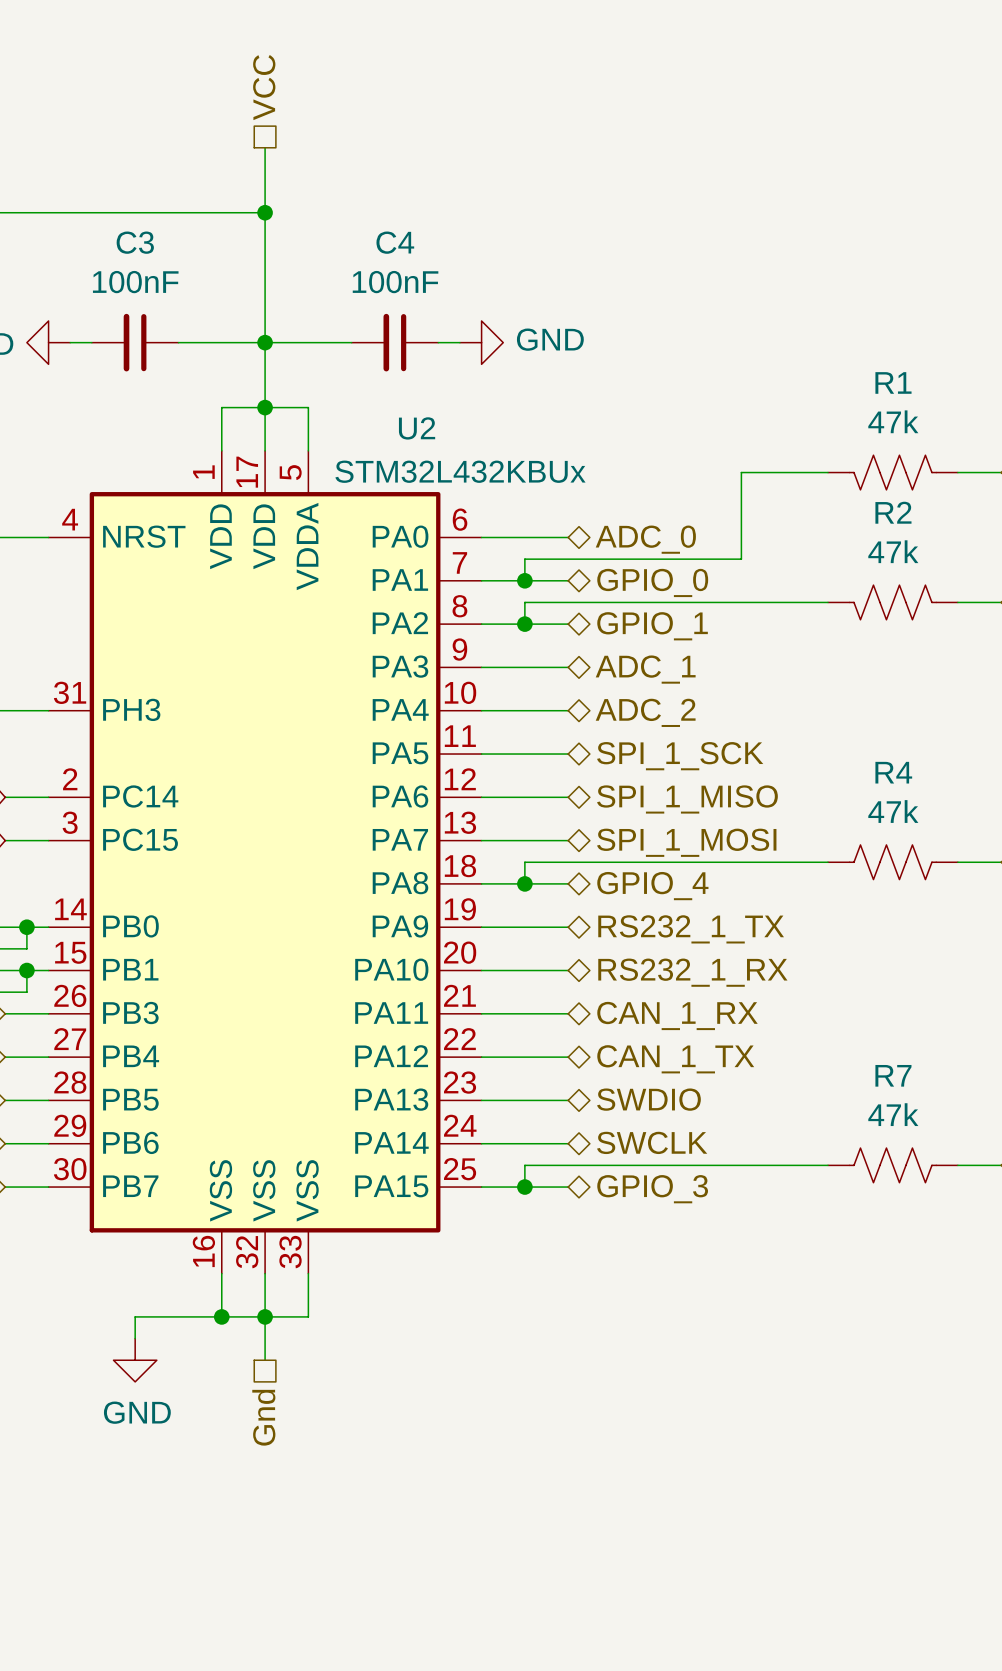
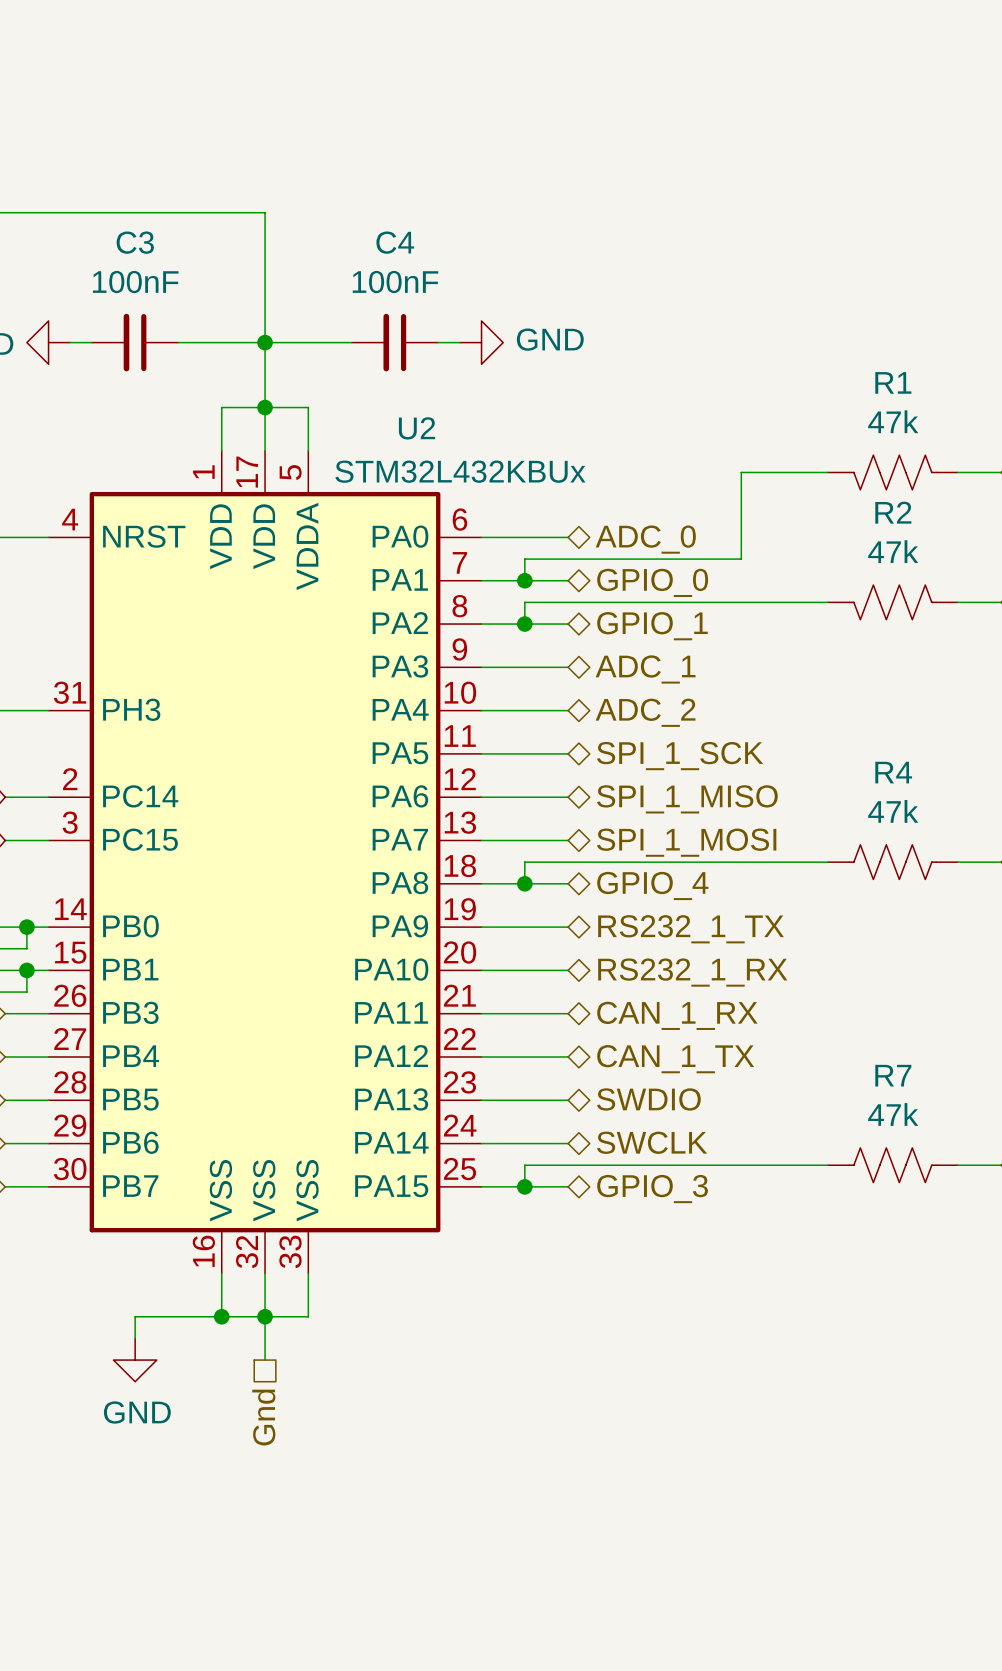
hierarchical label: VCC (264, 87) -> none
wire: (265, 147) (265, 212) -> none
junction: (265, 212) -> none

